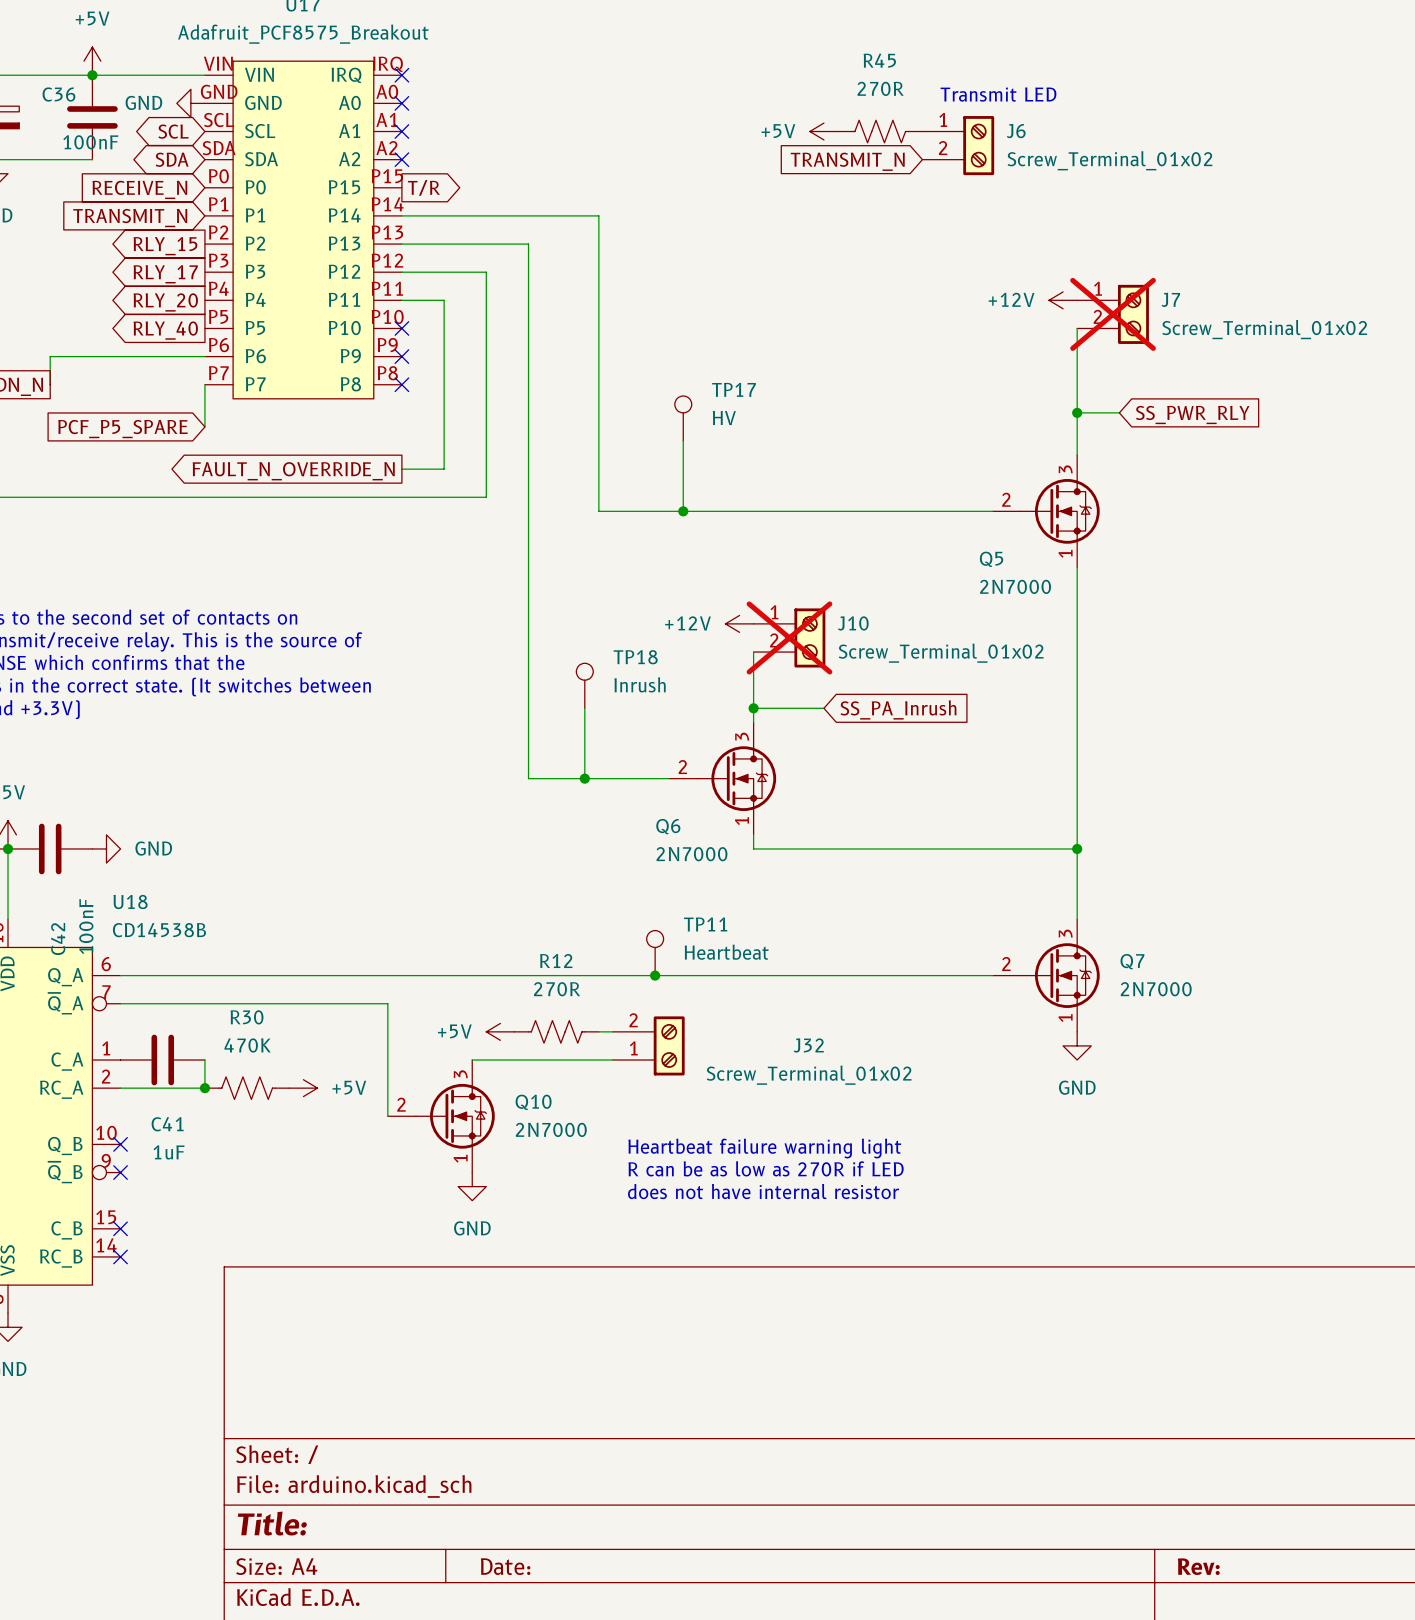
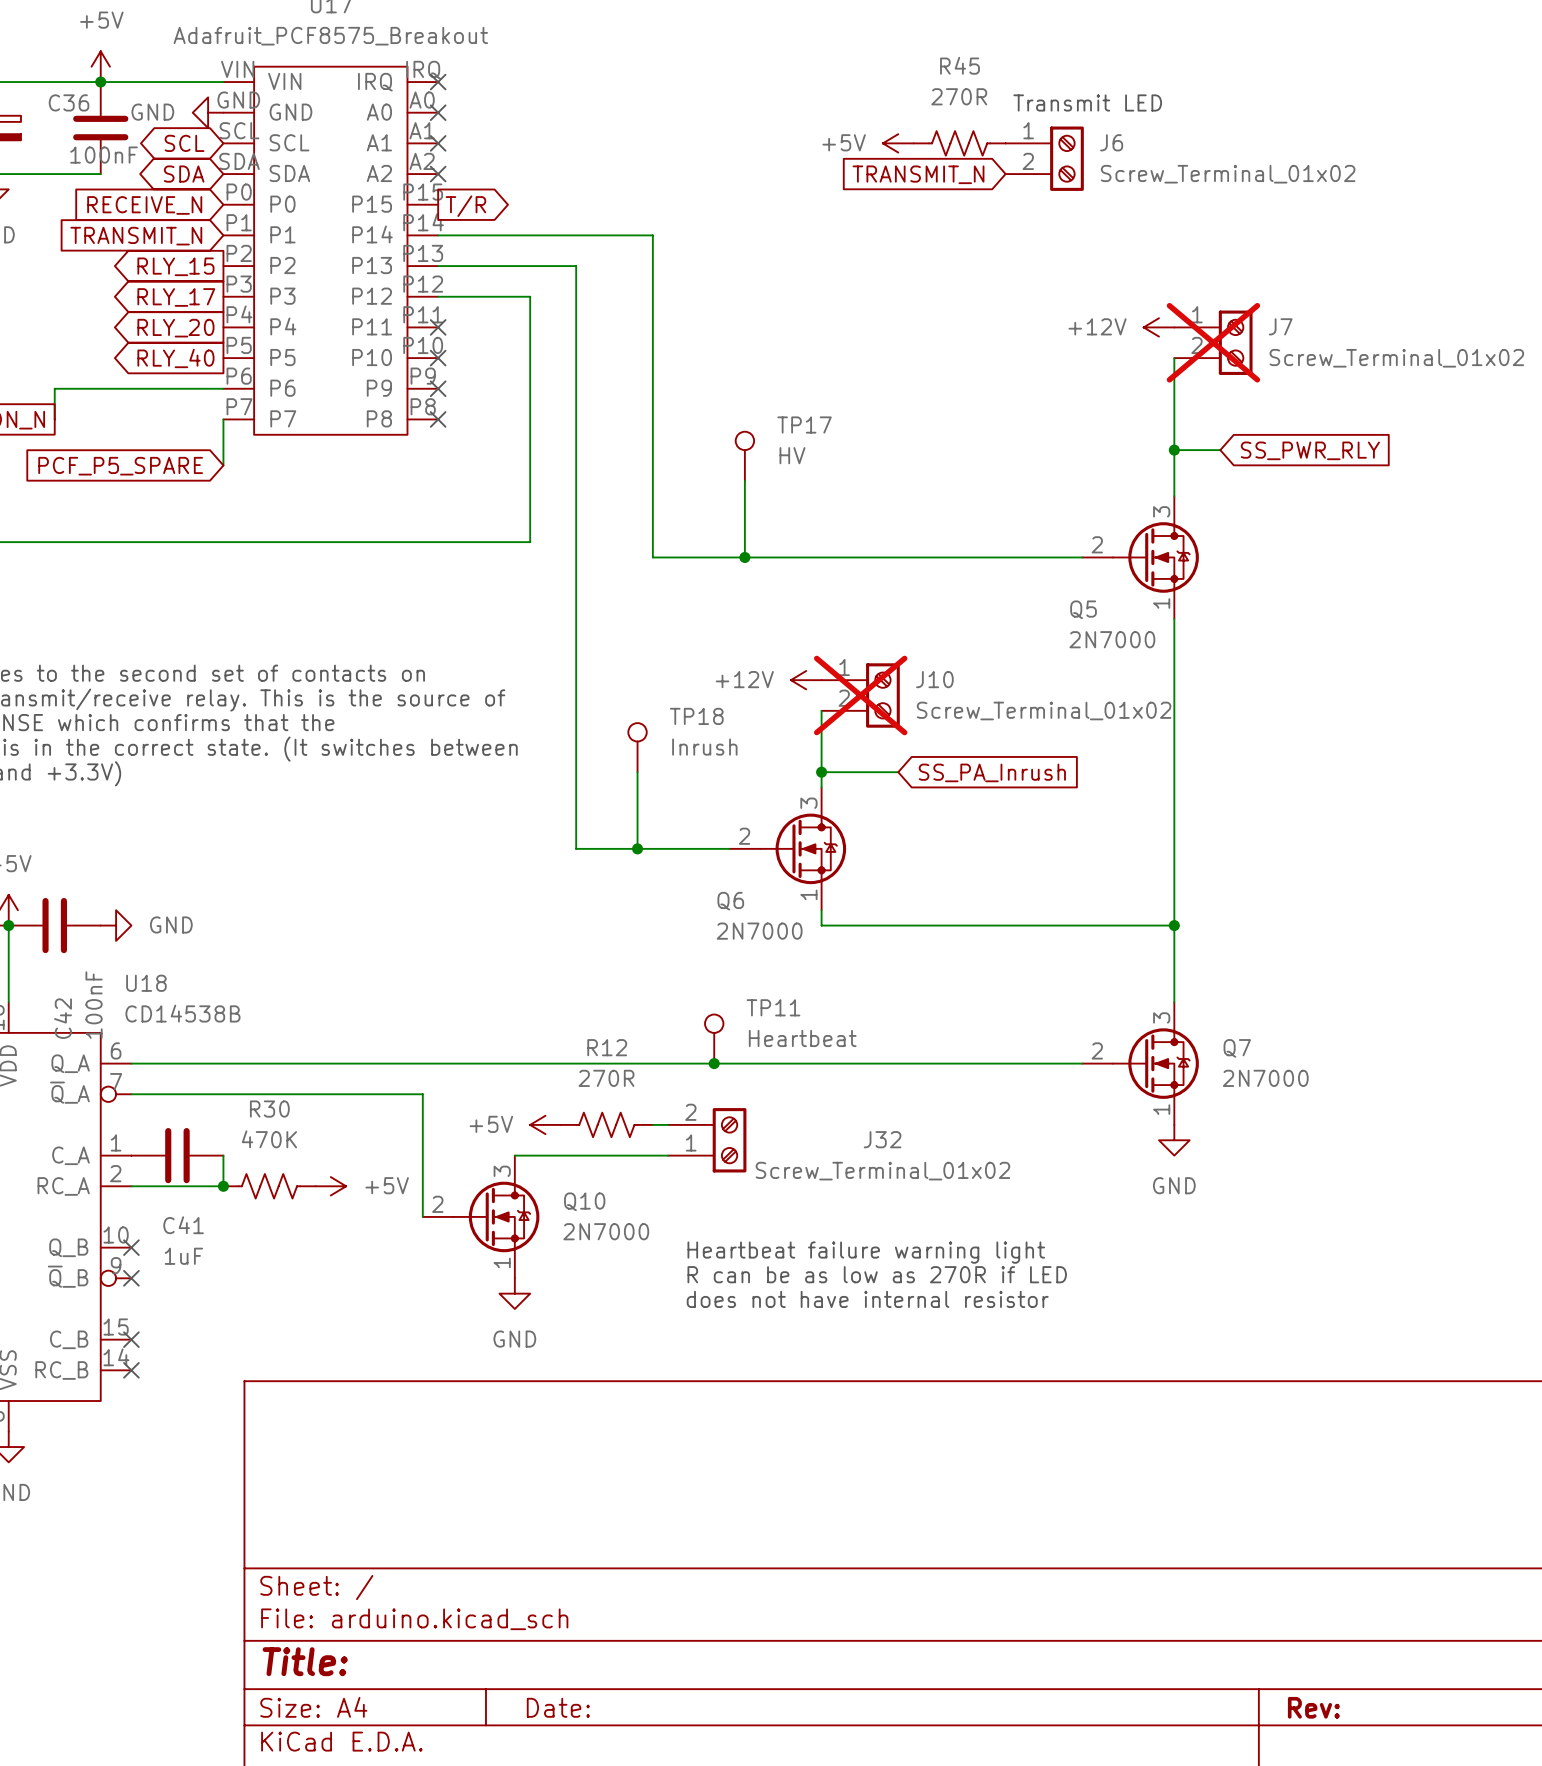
wire: (401, 300) (444, 300) (444, 469) (401, 469) -> none
no-connect mark: none -> (438, 327)
global label: FAULT_N_OVERRIDE_N (293, 471) -> none

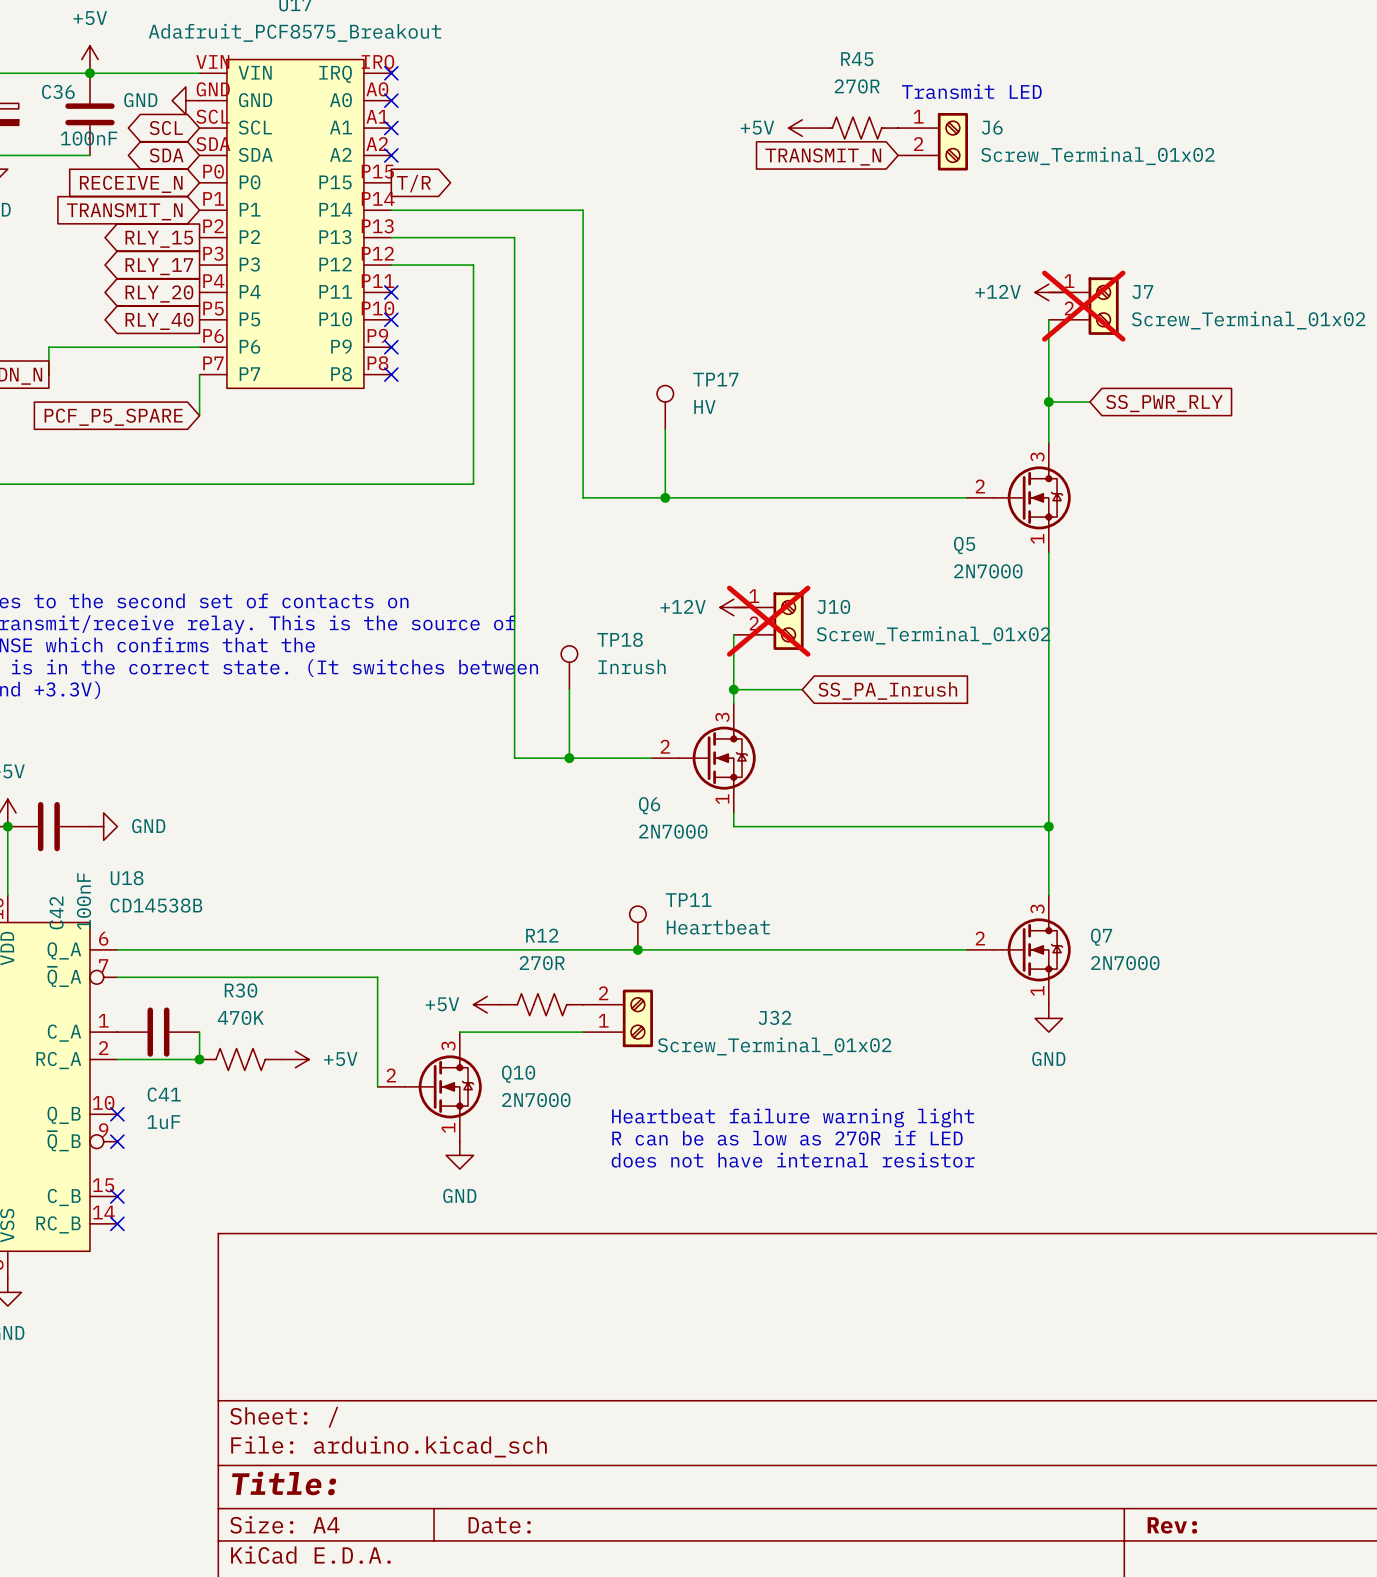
power symbol position: +12V (1158, 327) -> +12V (1048, 292)
power symbol position: +12V (806, 680) -> +12V (733, 607)
J32 position: (707, 1140) -> (618, 1018)

